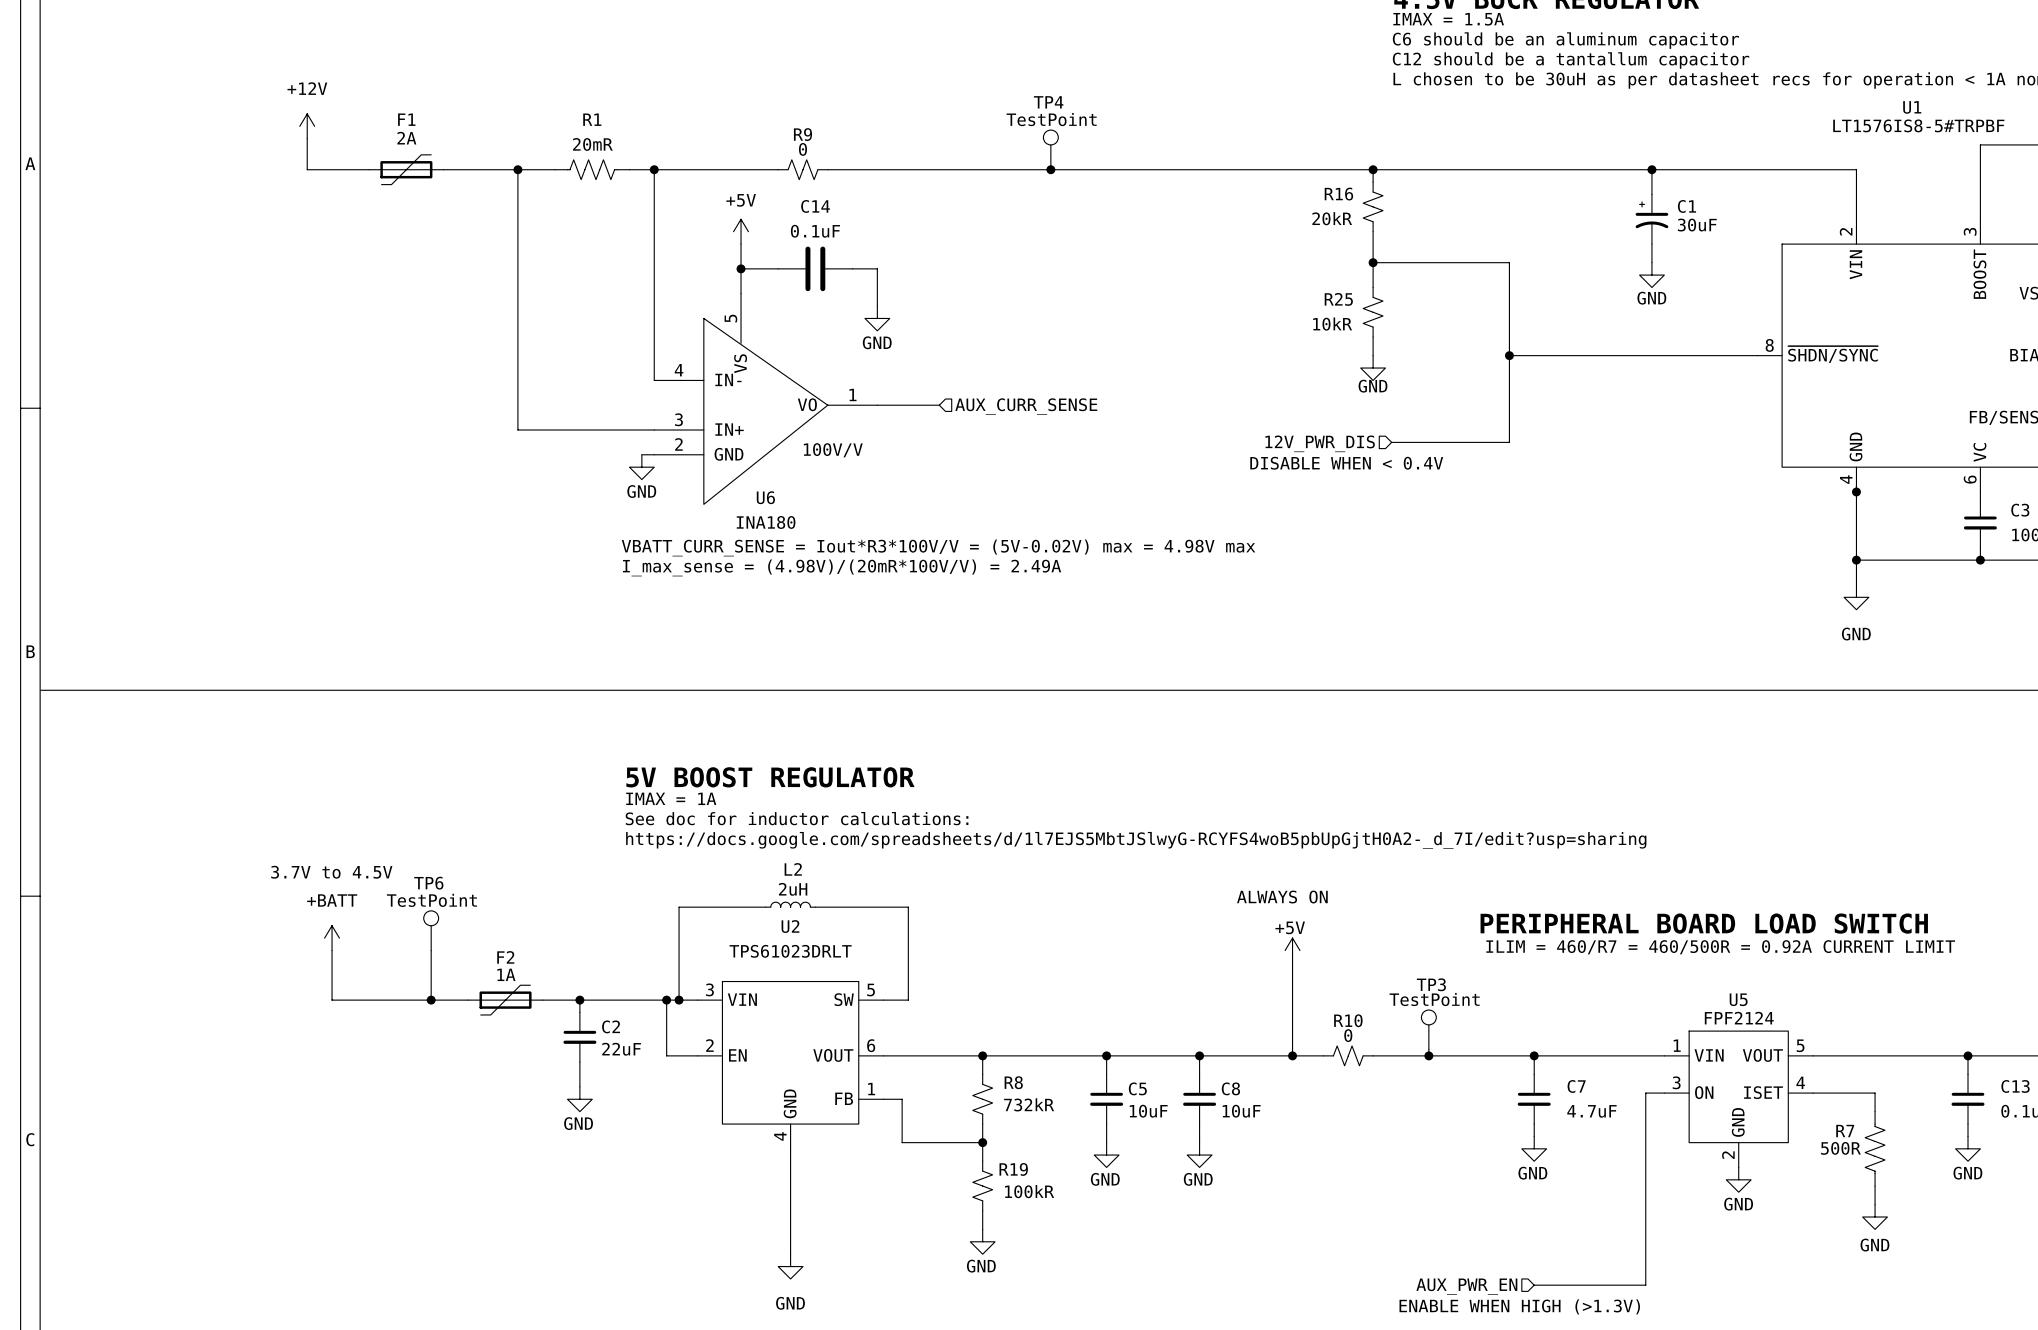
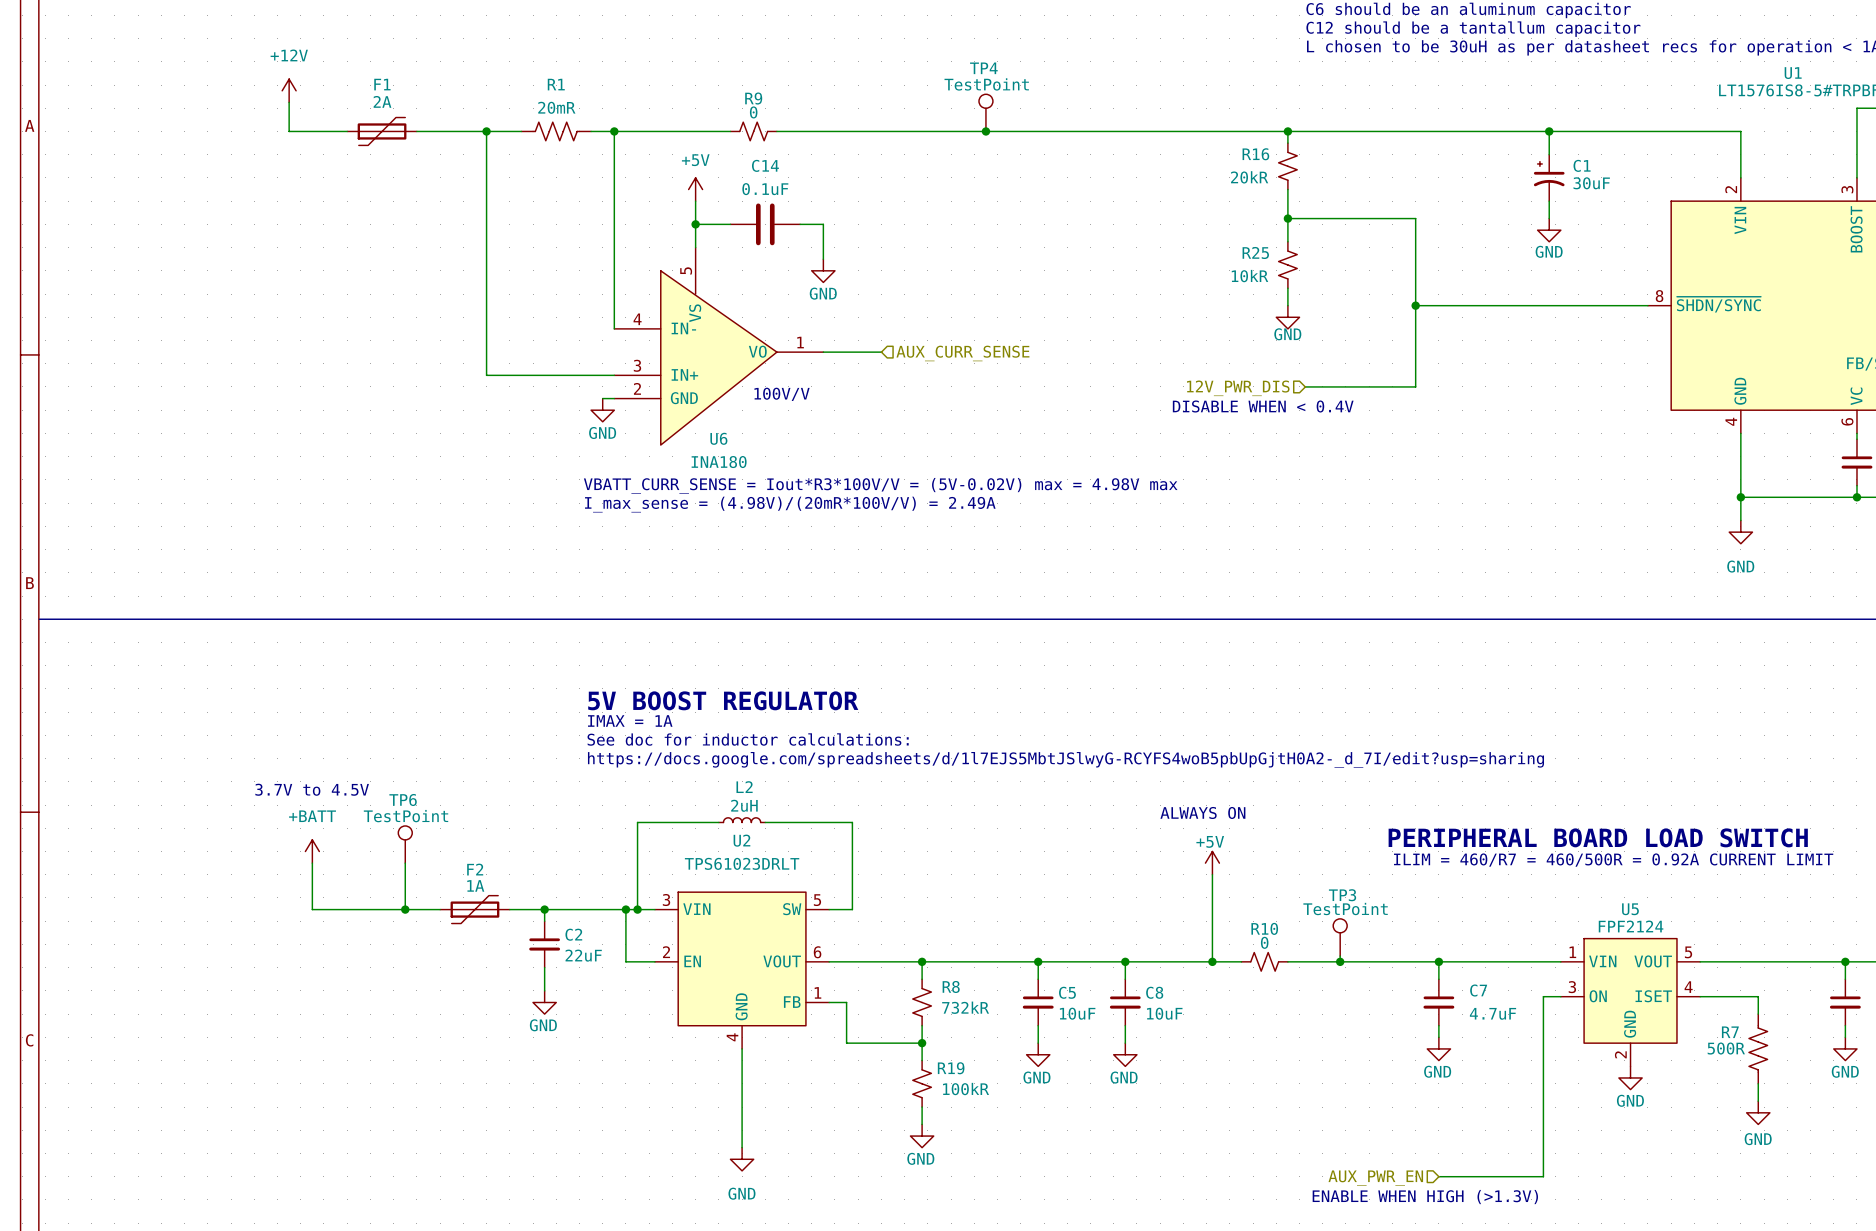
junction: (1856, 491) -> none

